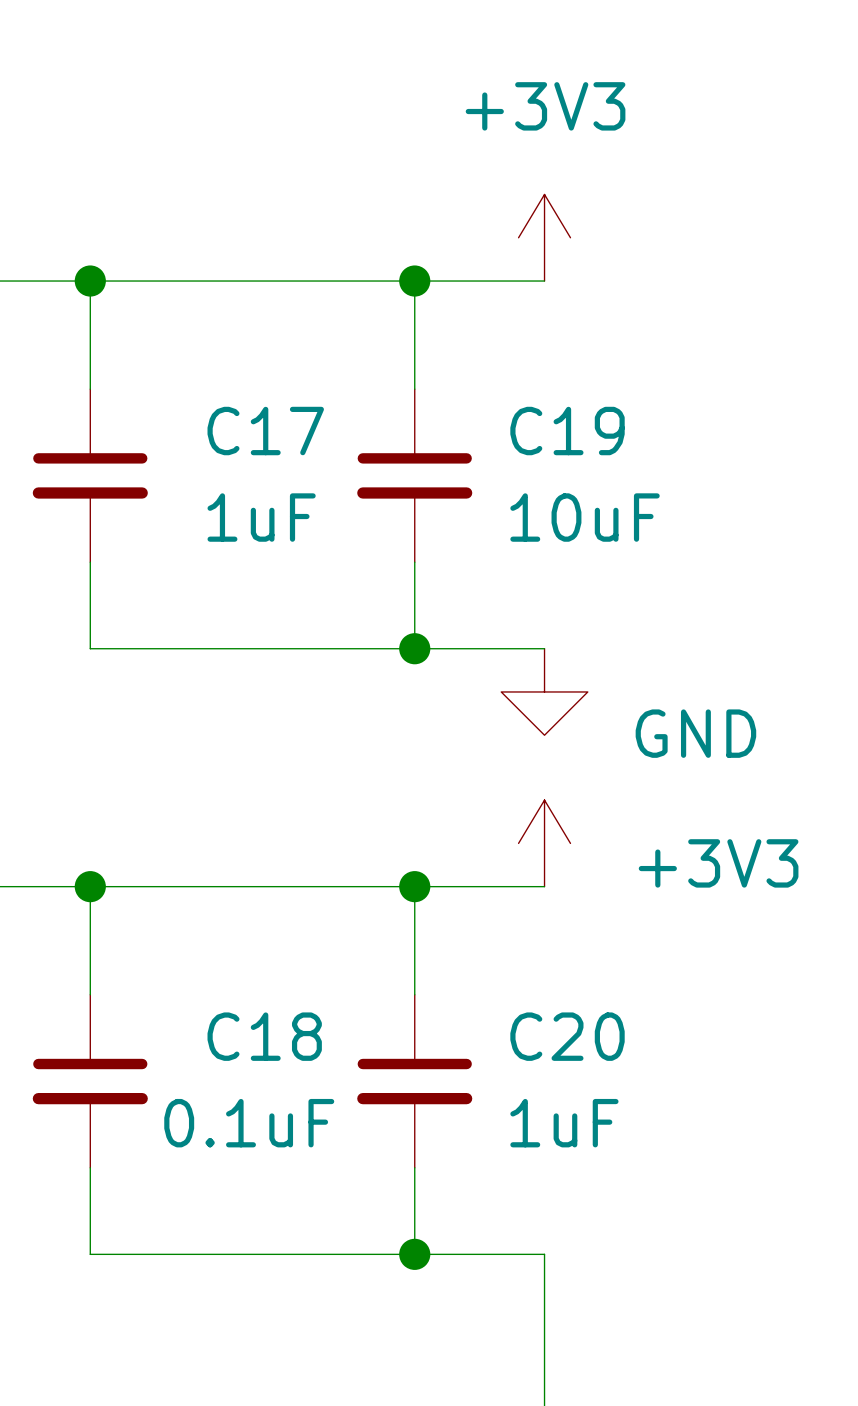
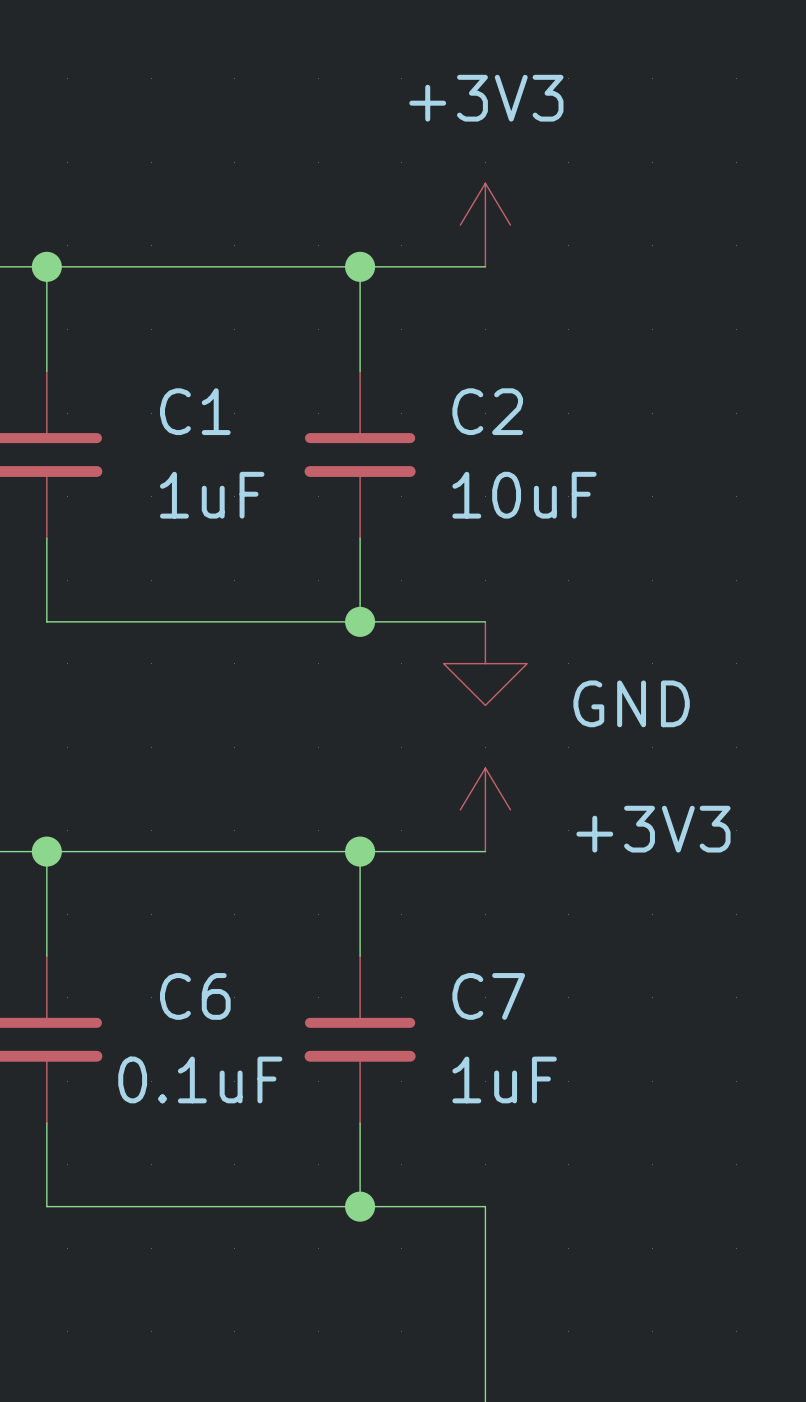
C17 name: C17 (265, 431) -> C1 (195, 411)
C19 name: C19 (567, 431) -> C2 (487, 411)
C18 name: C18 (264, 1036) -> C6 (195, 996)
C20 name: C20 (567, 1036) -> C7 (488, 996)

